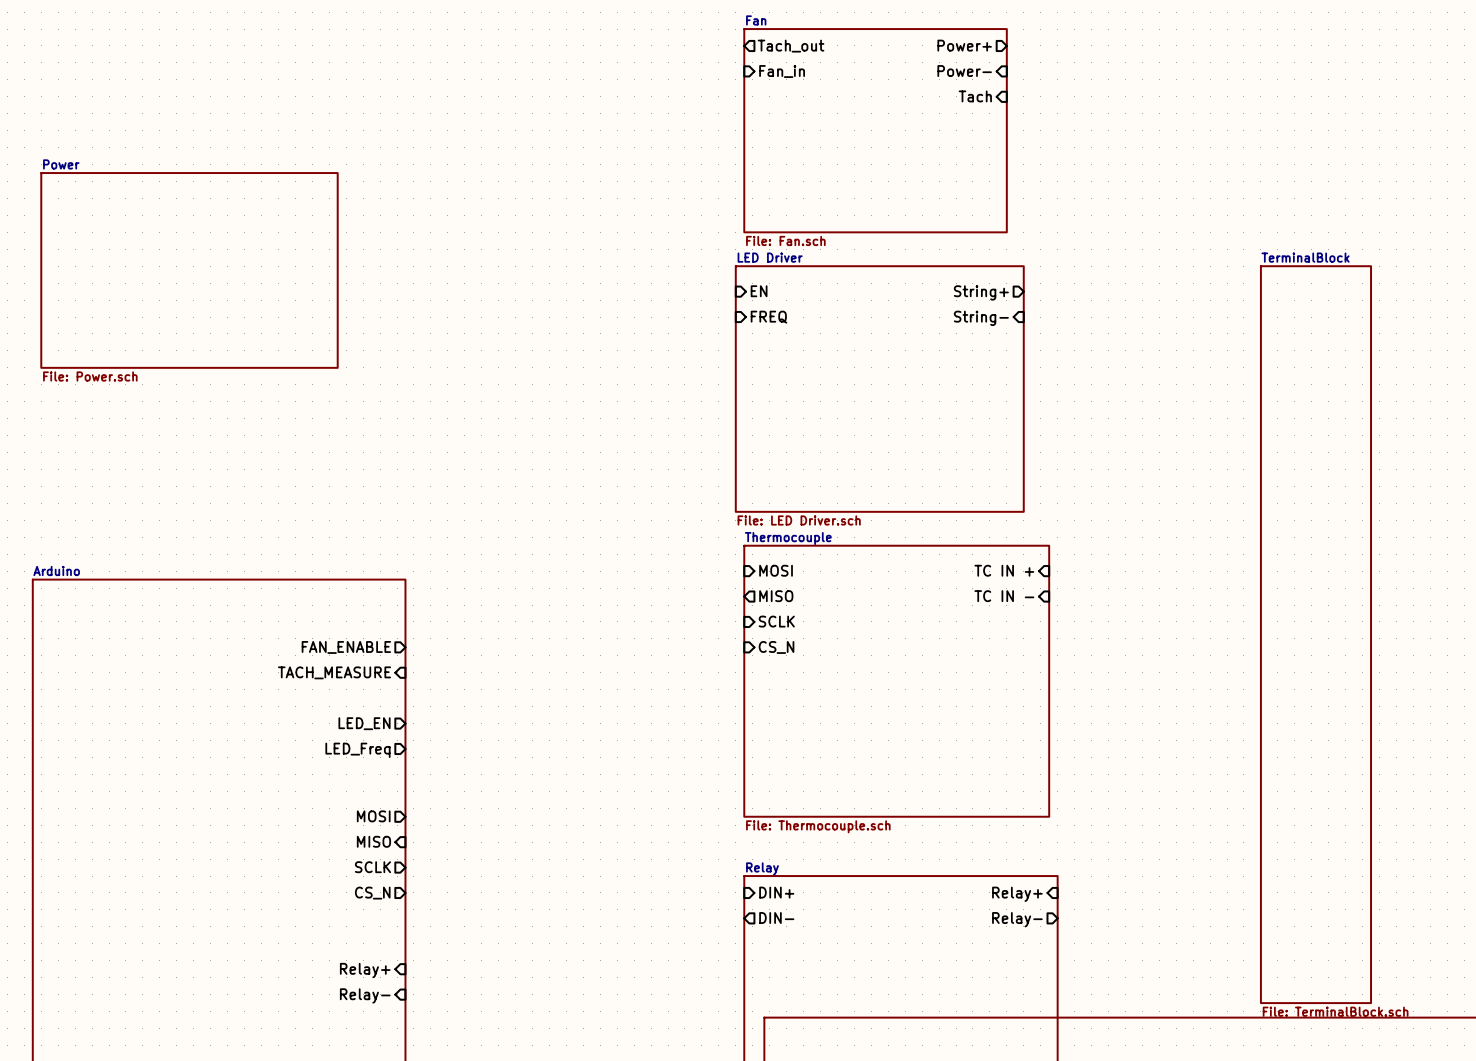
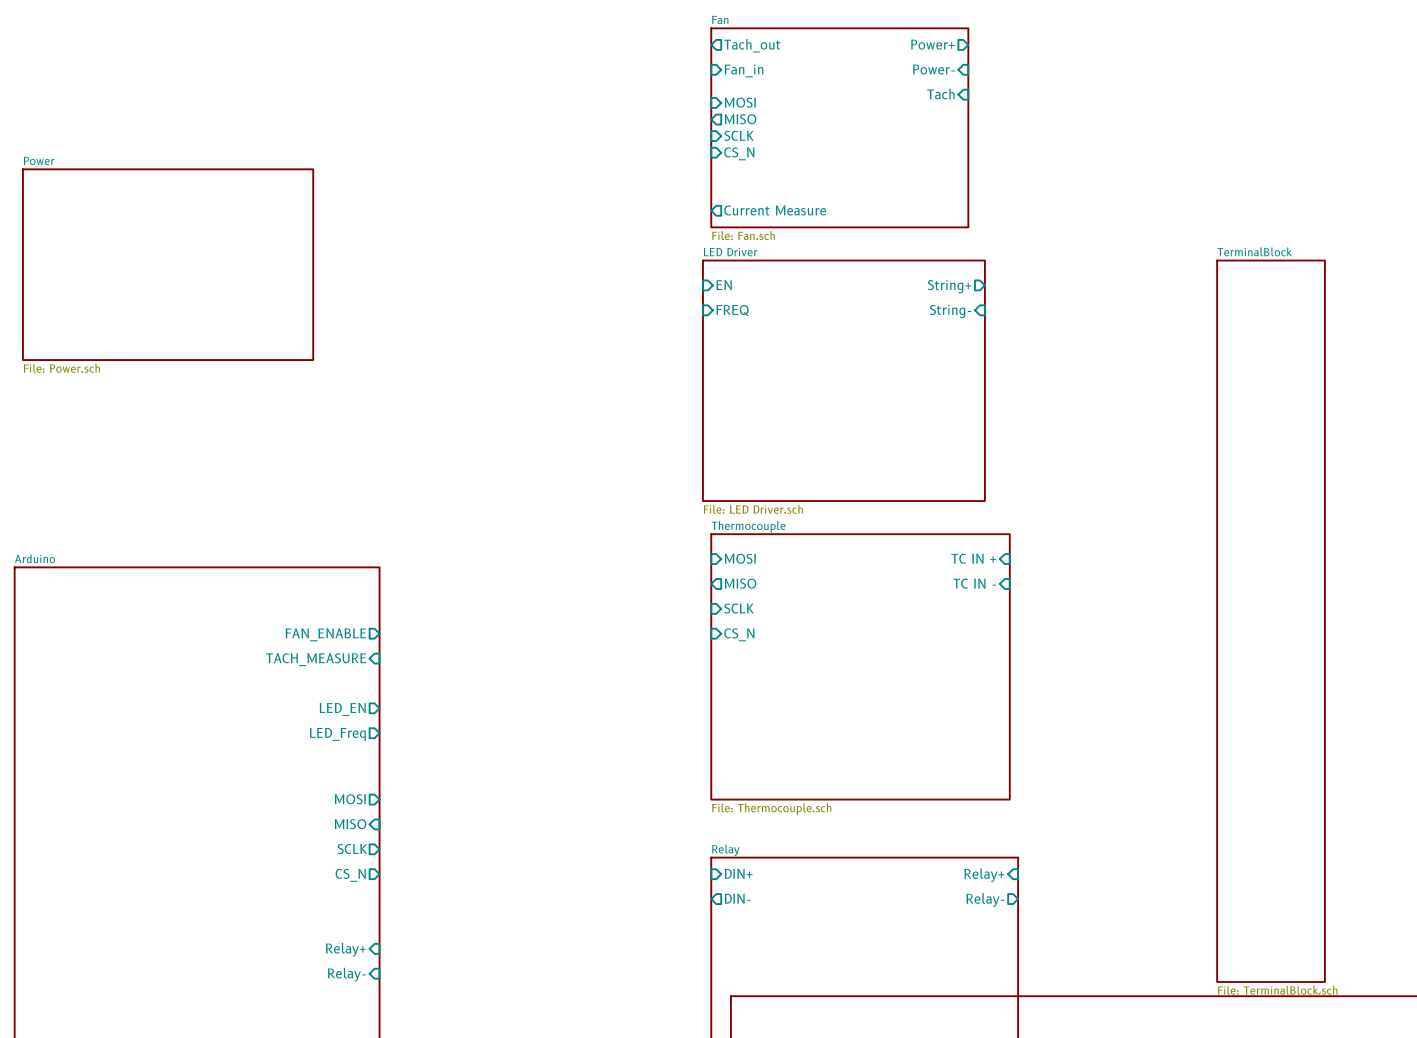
sheet pin: none -> MOSI (740, 102)
sheet pin: none -> MISO (740, 119)
sheet pin: none -> SCLK (738, 135)
sheet pin: none -> CS_N (739, 153)
sheet pin: none -> Current Measure (775, 210)

